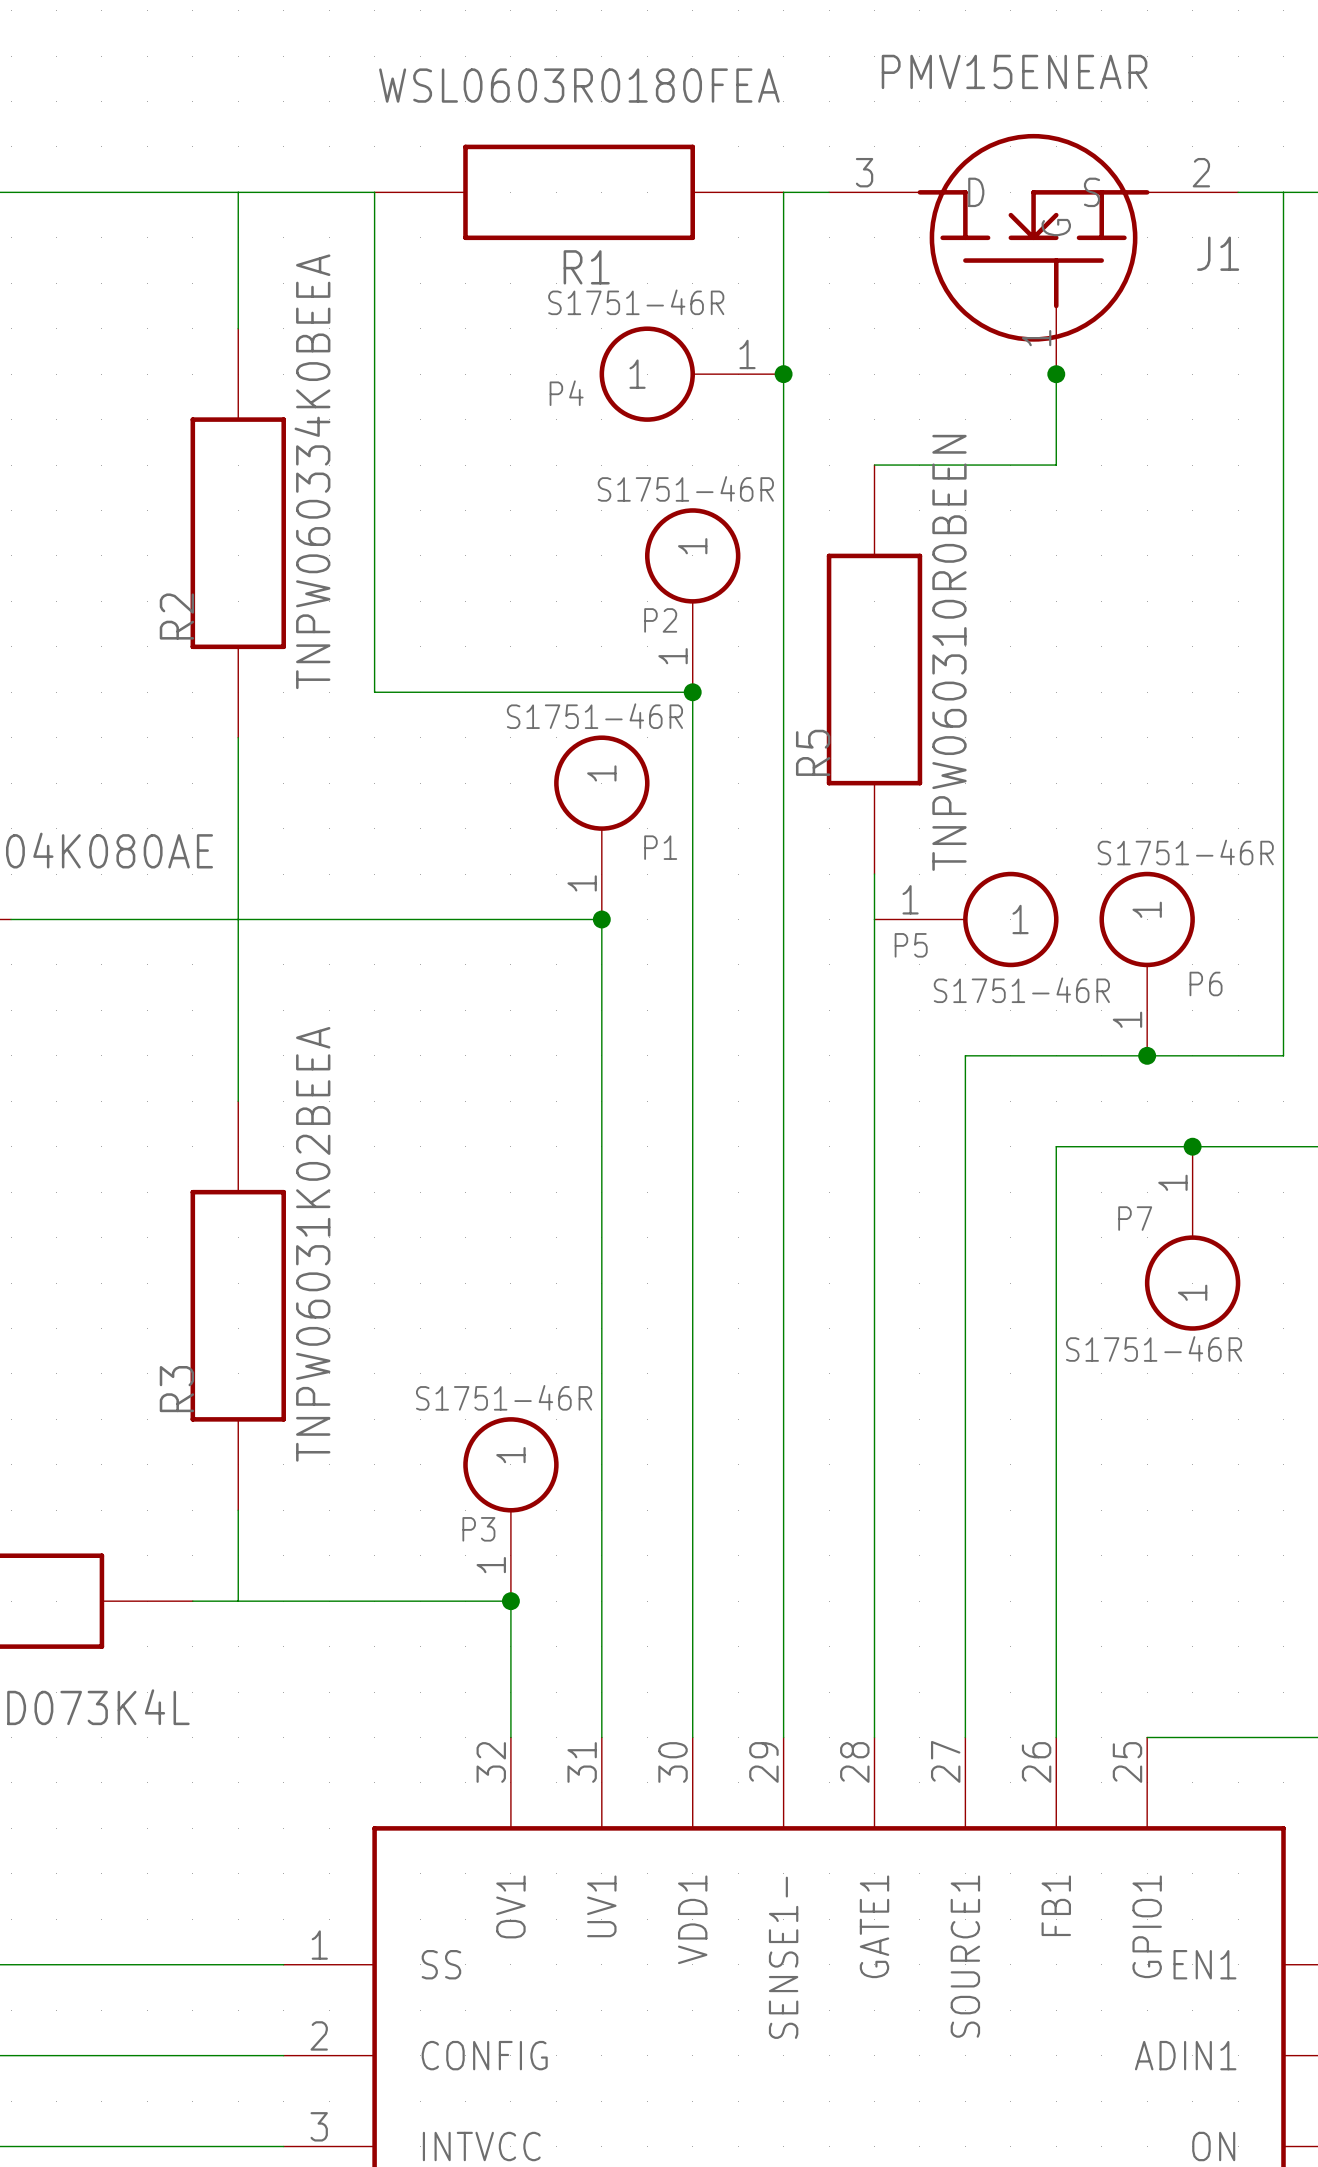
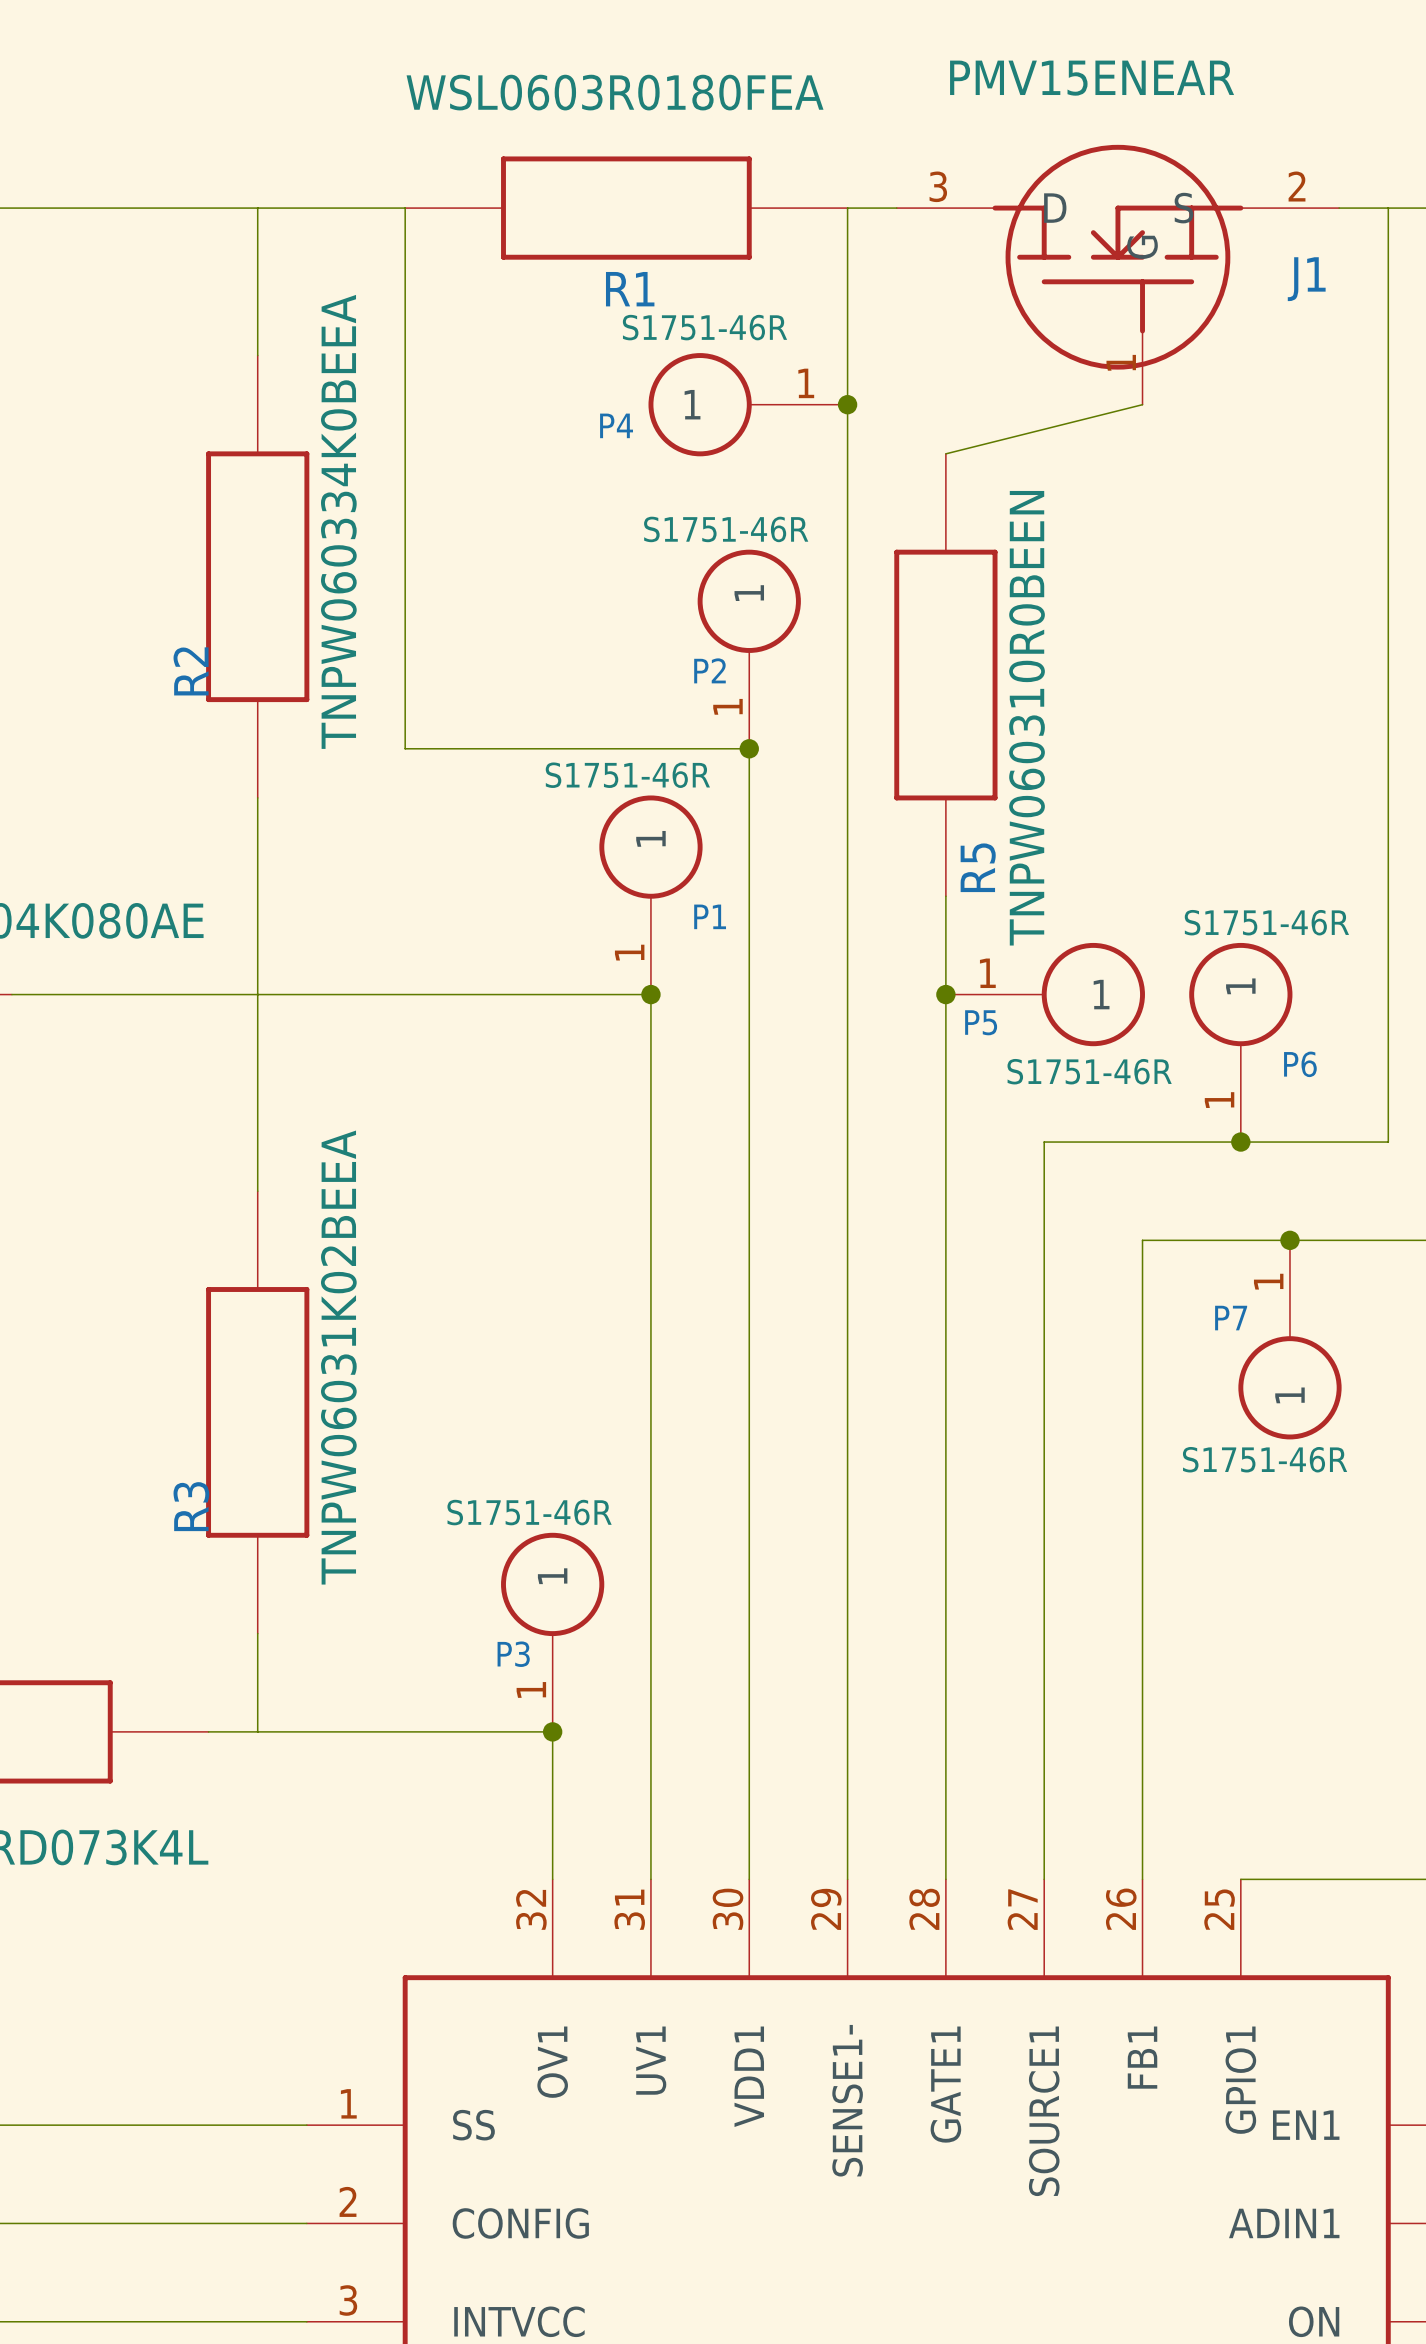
wire: (1056, 374) (1056, 465) (874, 465) -> (1142, 404) (945, 453)
junction: (1056, 374) -> none
R5 position: (874, 669) -> (945, 675)
R5 name position: R5 (813, 752) -> R5 (978, 867)
junction: none -> (945, 994)

